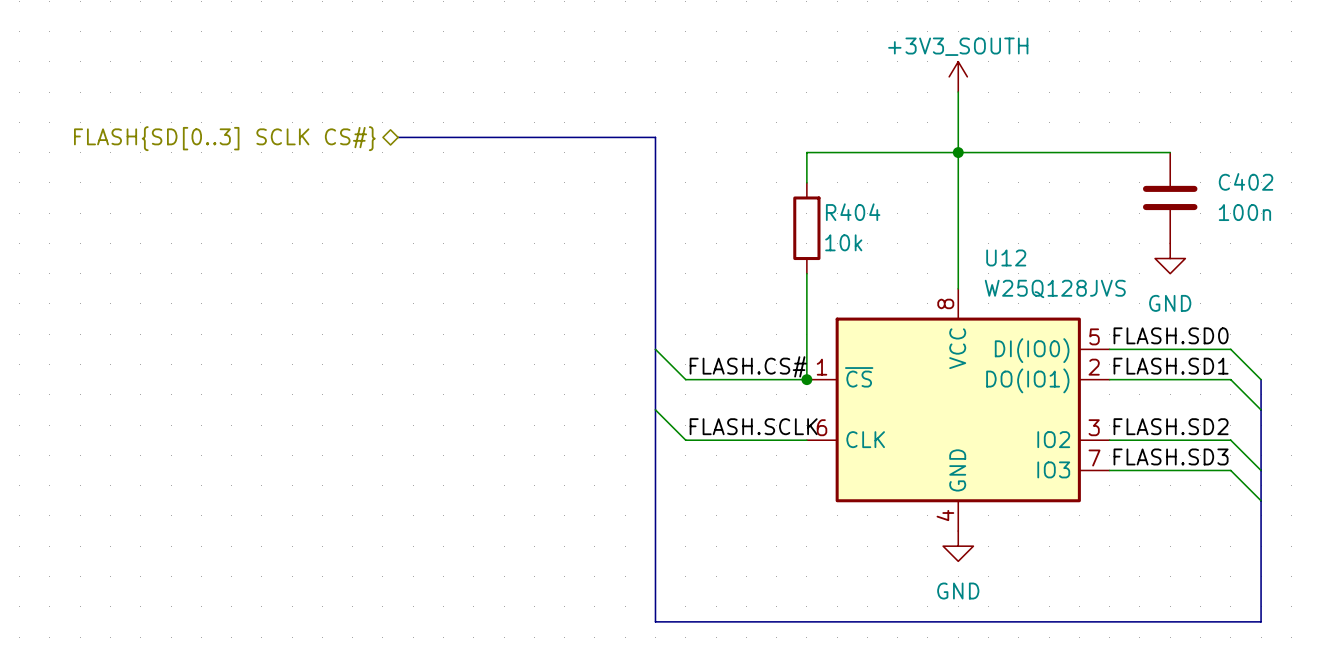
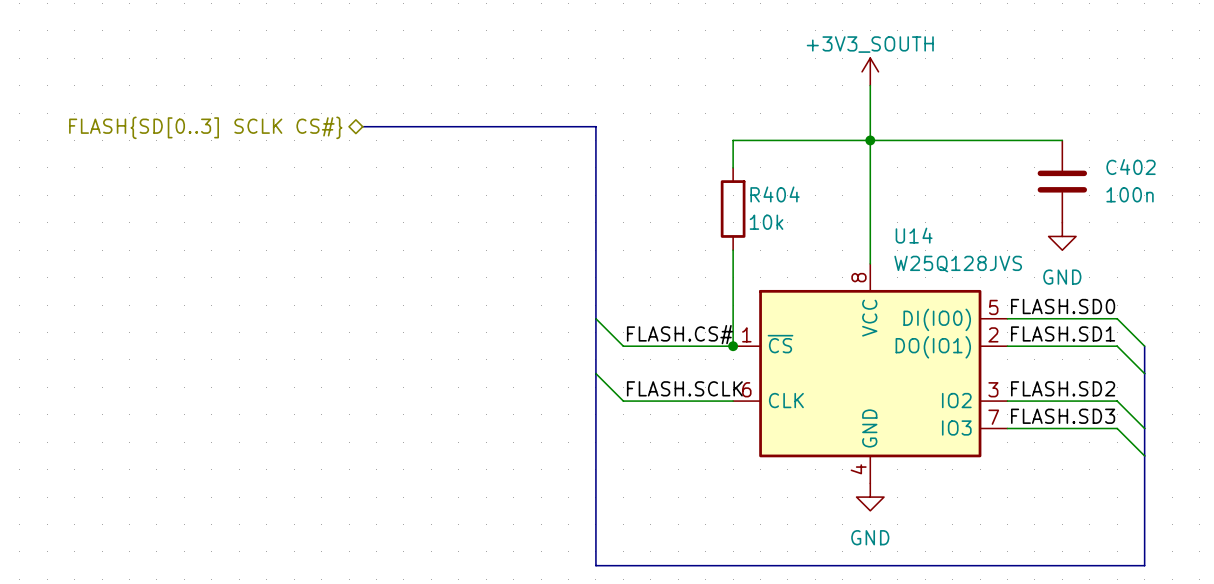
U12 name: U12 (1006, 257) -> U14 (914, 235)

